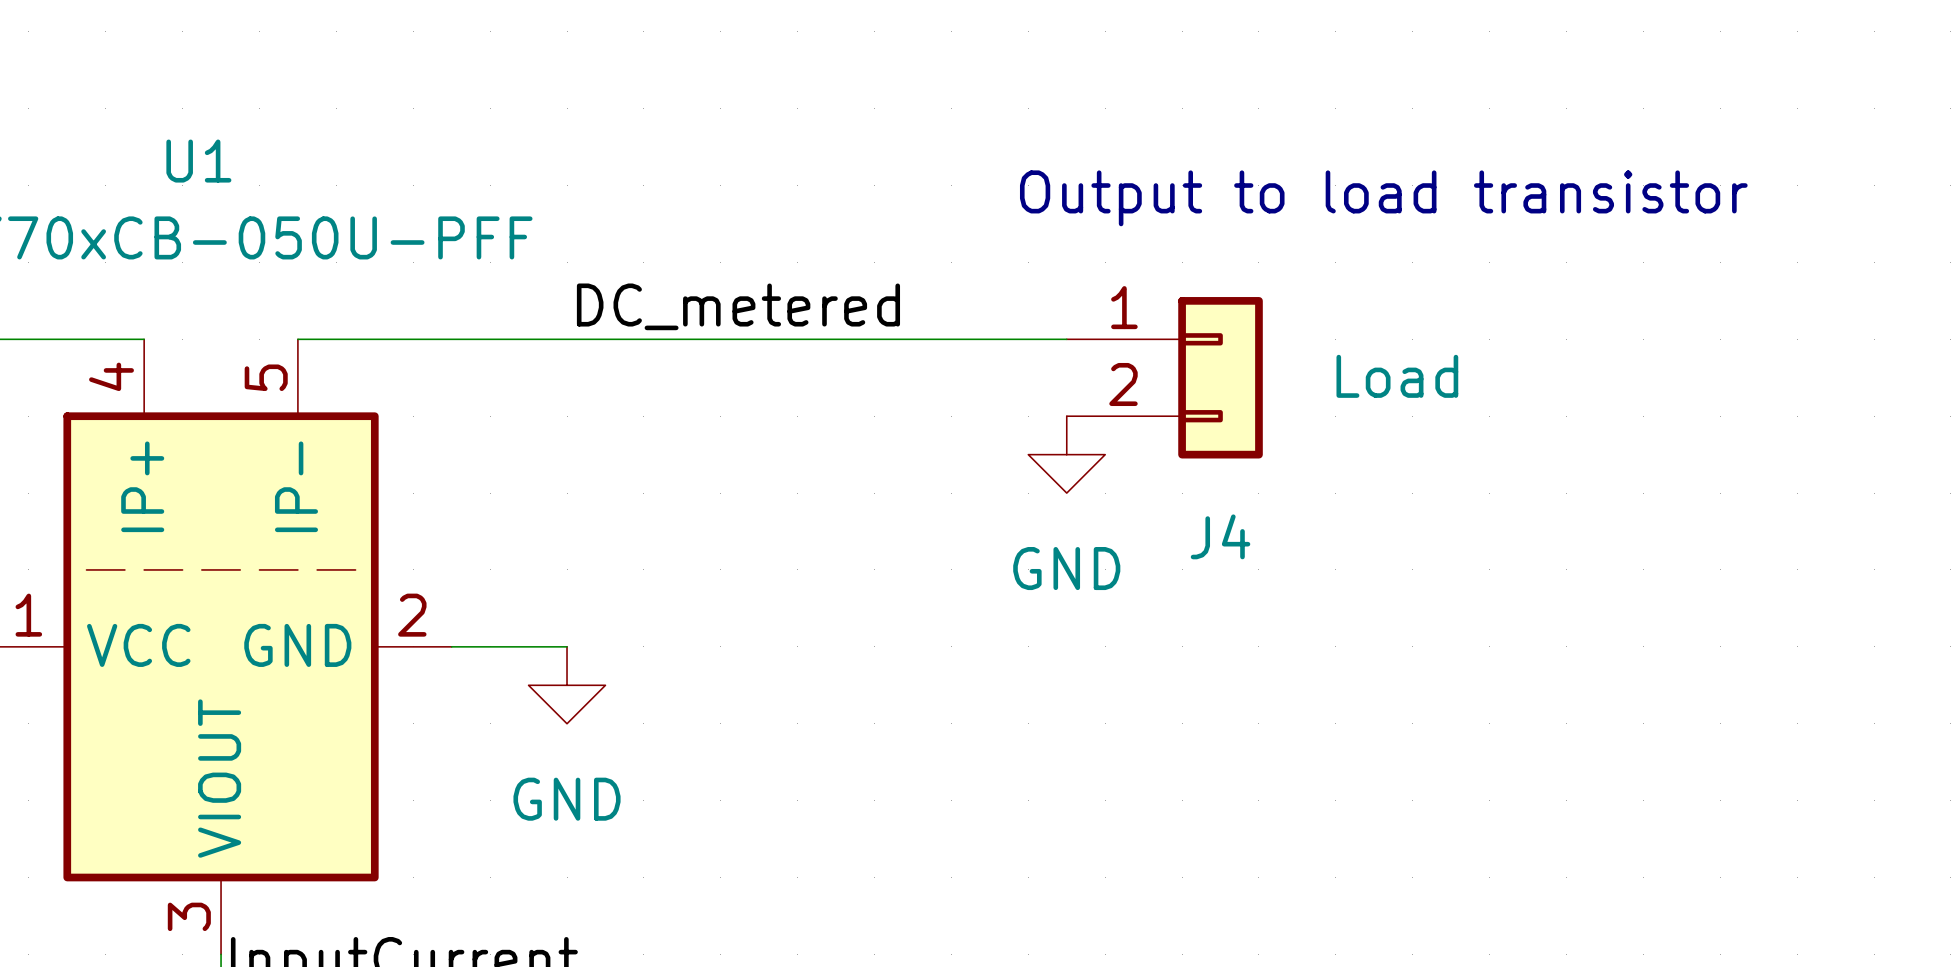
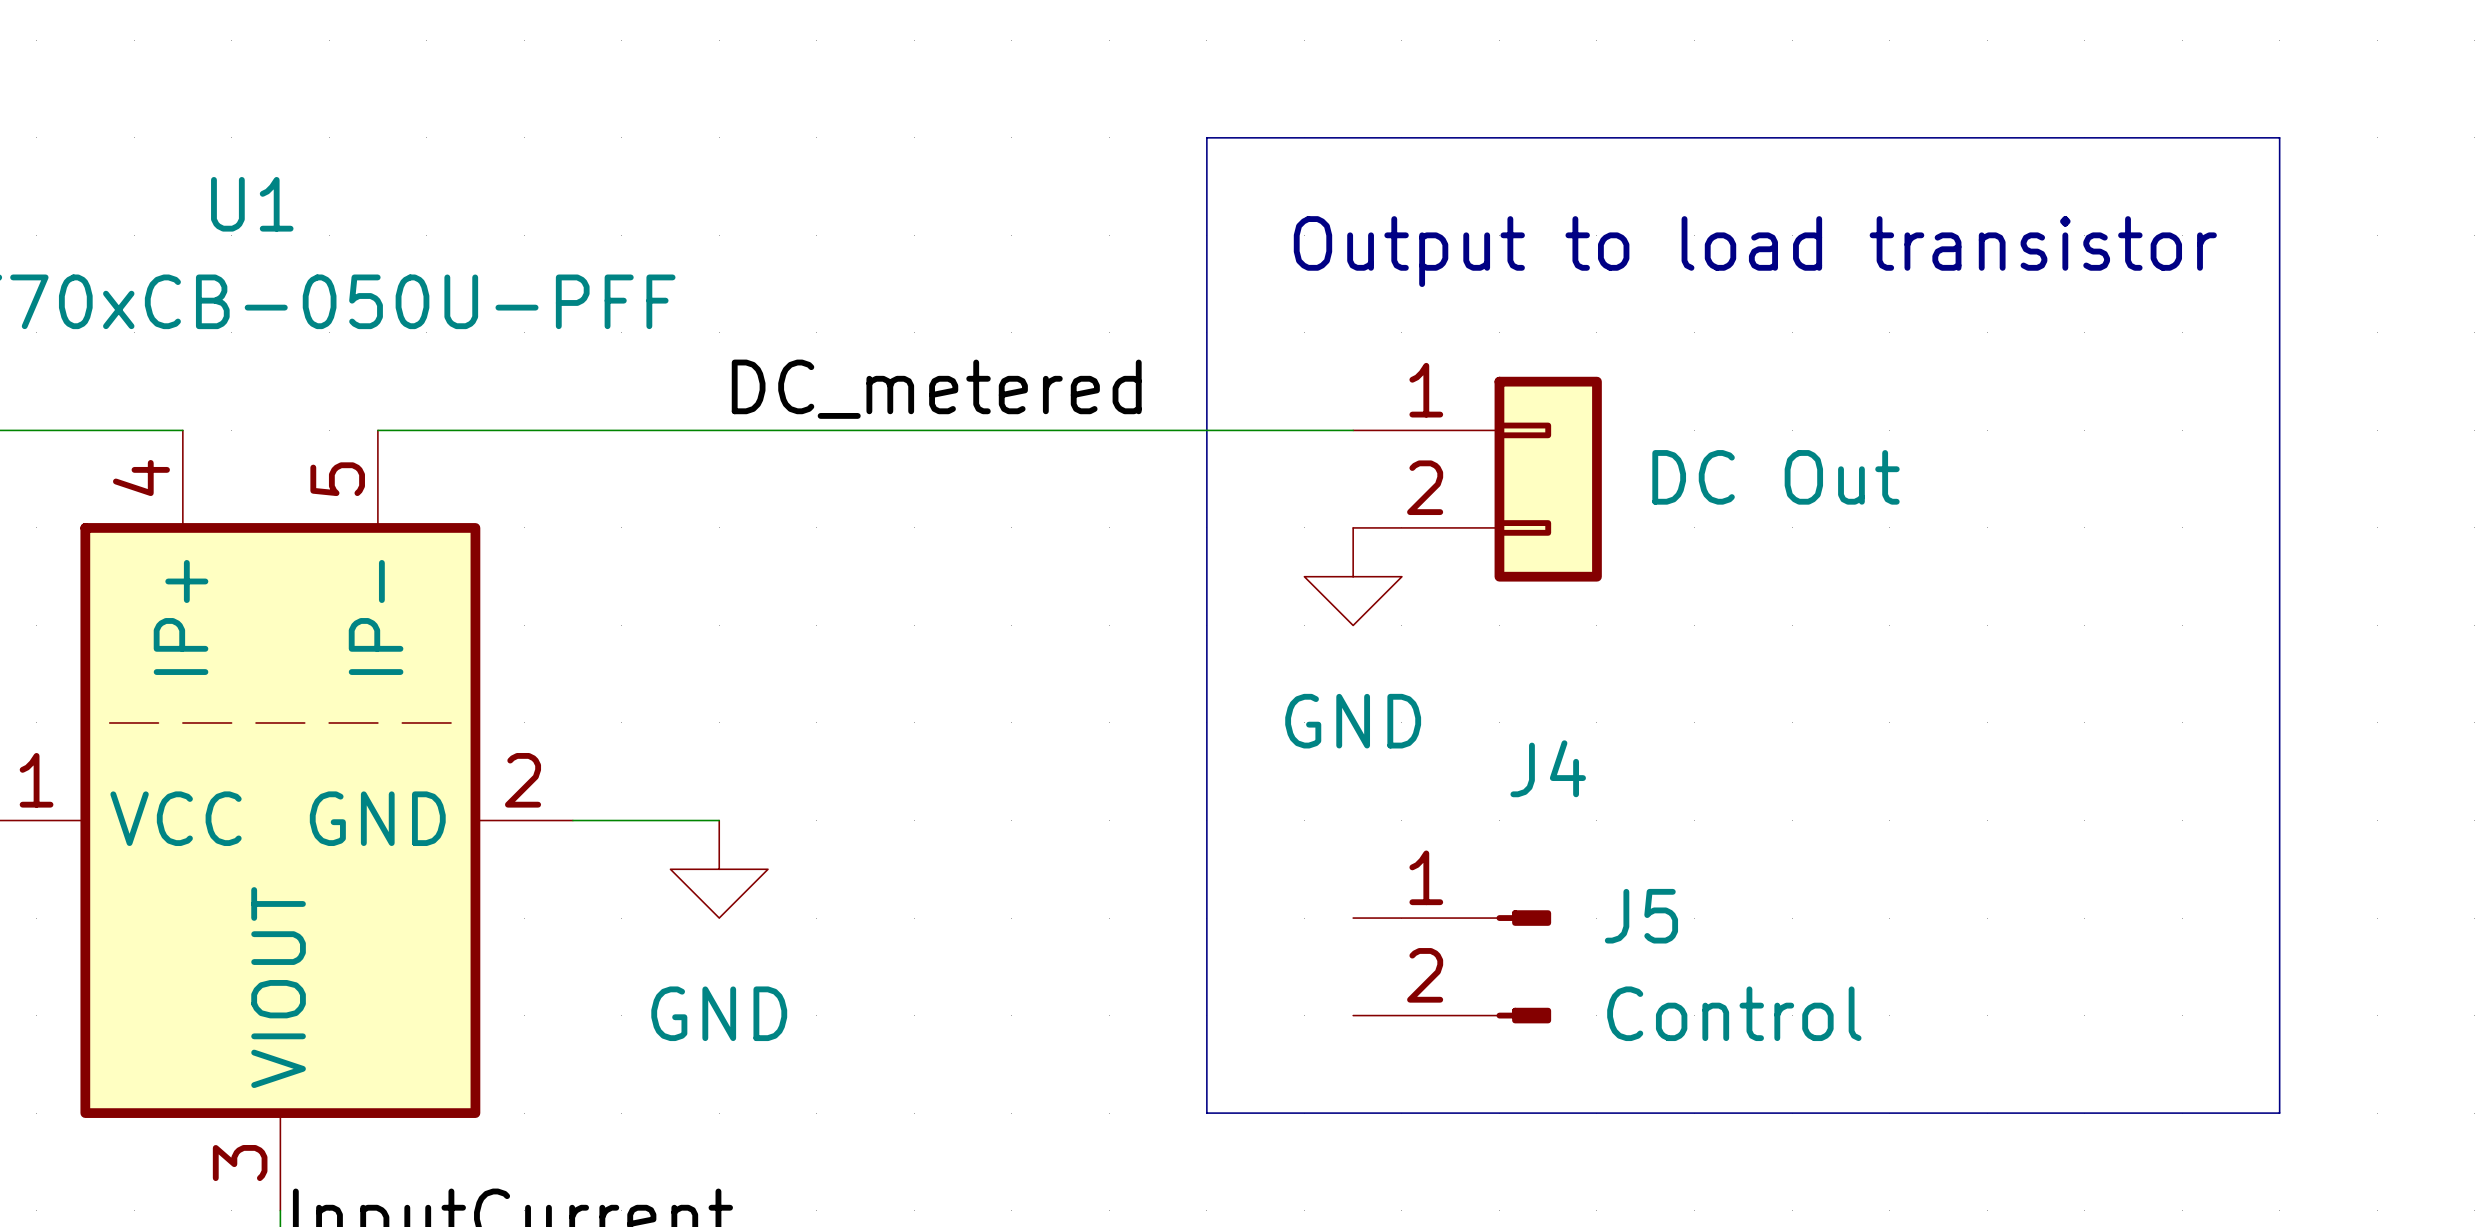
line: none -> (1206, 137) (2279, 137) (2279, 1113) (1206, 1113) (1206, 137)
J4 value: Load (1397, 376) -> DC Out (1776, 477)
J4 name position: J4 (1220, 536) -> J4 (1548, 768)
J5: none -> Control (1452, 966)

